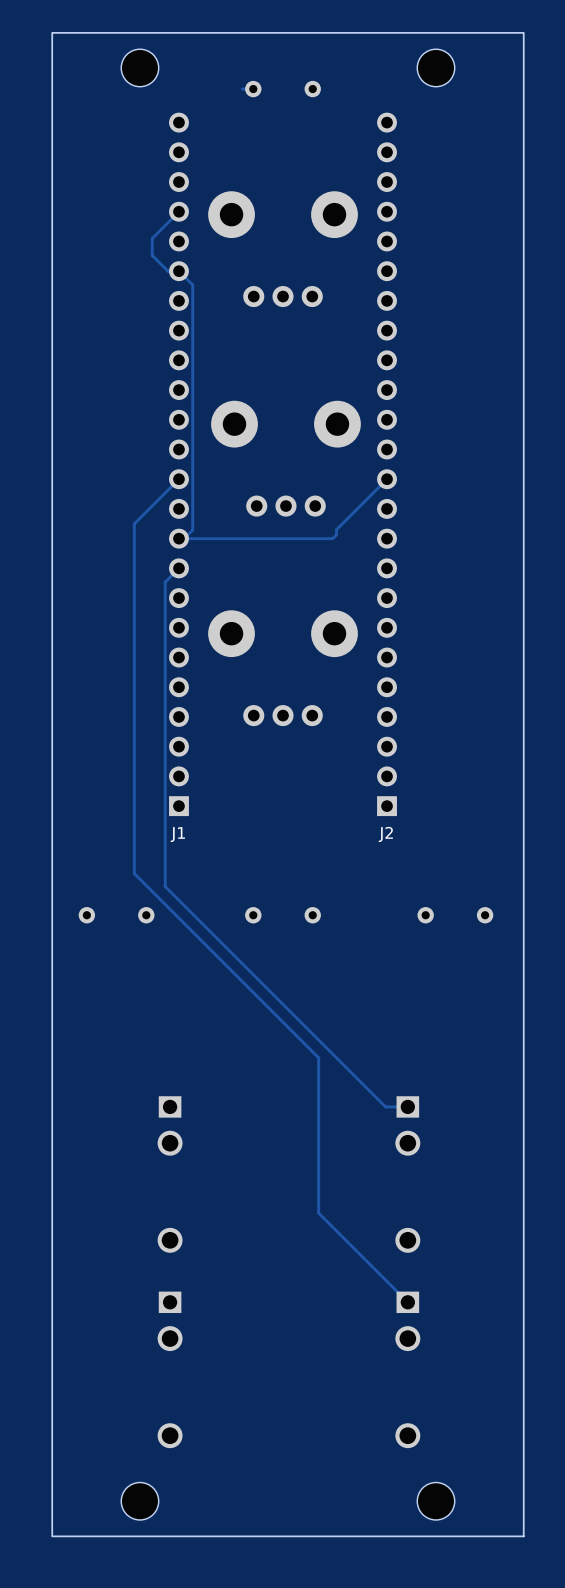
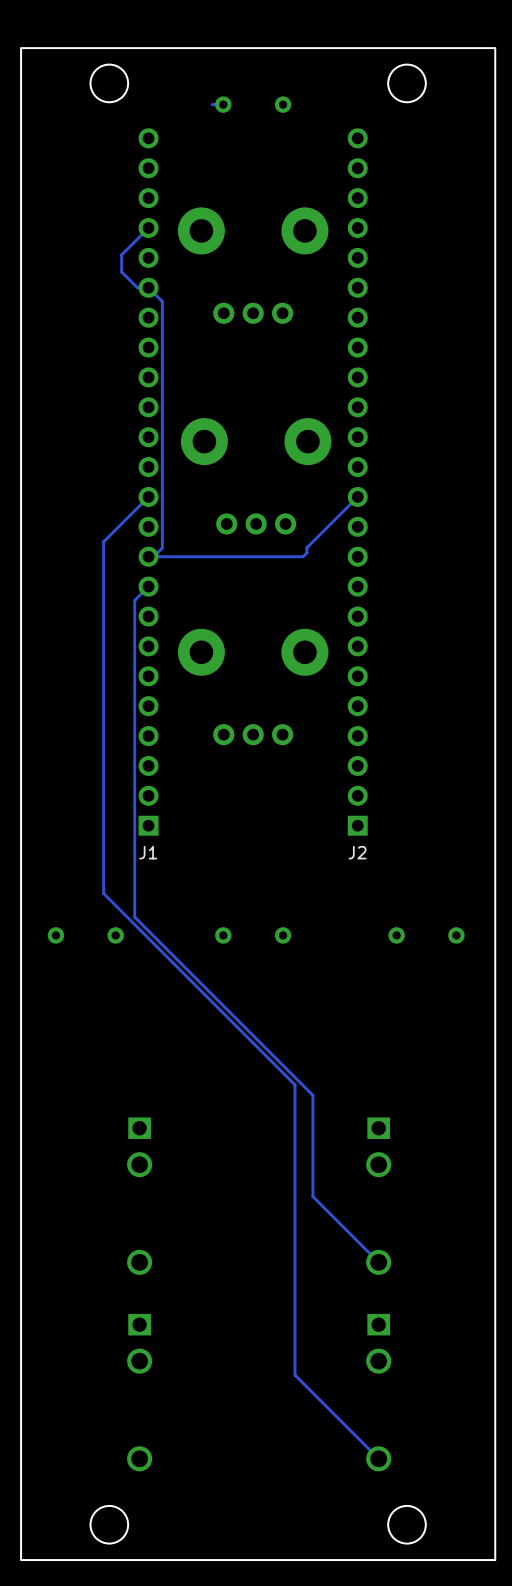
track: (165, 886) (385, 1106) (407, 1106) -> (134, 906) (134, 917) (312, 1095) (312, 1196) (378, 1262)
track: (318, 1057) (318, 1213) (407, 1302) -> (289, 1078) (295, 1084) (295, 1375) (378, 1458)

